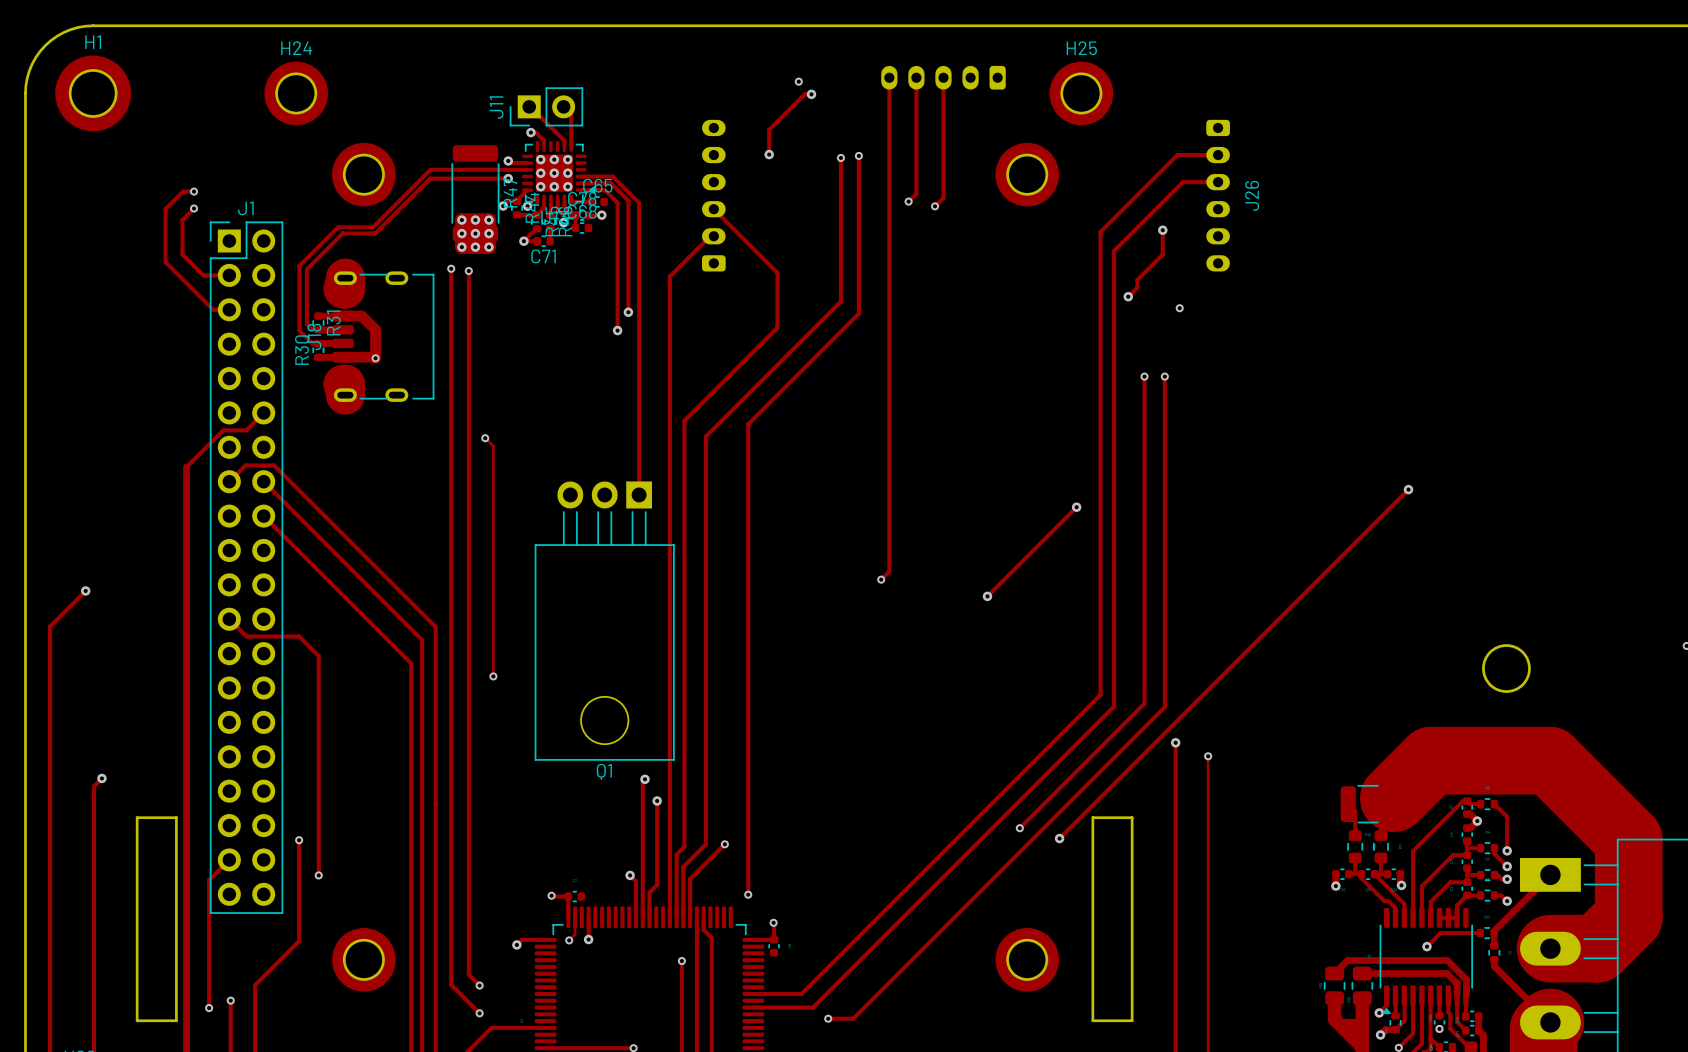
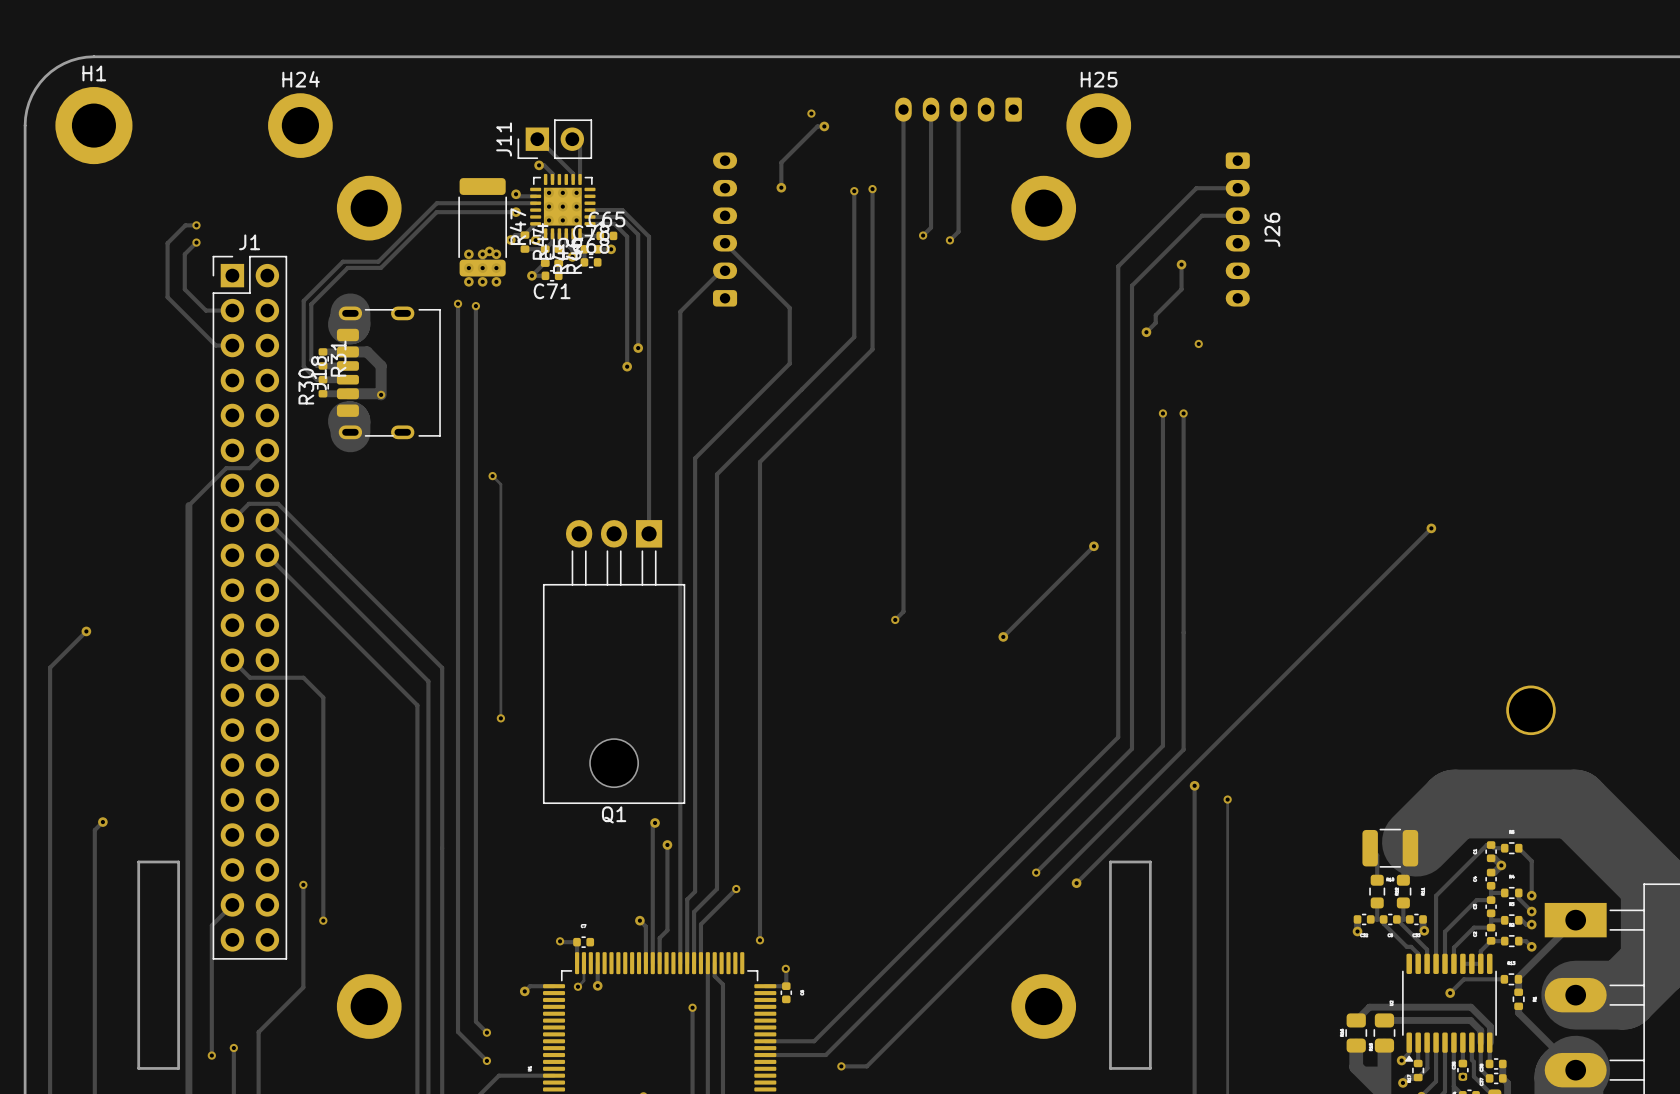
via: none -> (489, 251)
track: (461, 220) (461, 247) (488, 247) (488, 220) (461, 220) -> none

